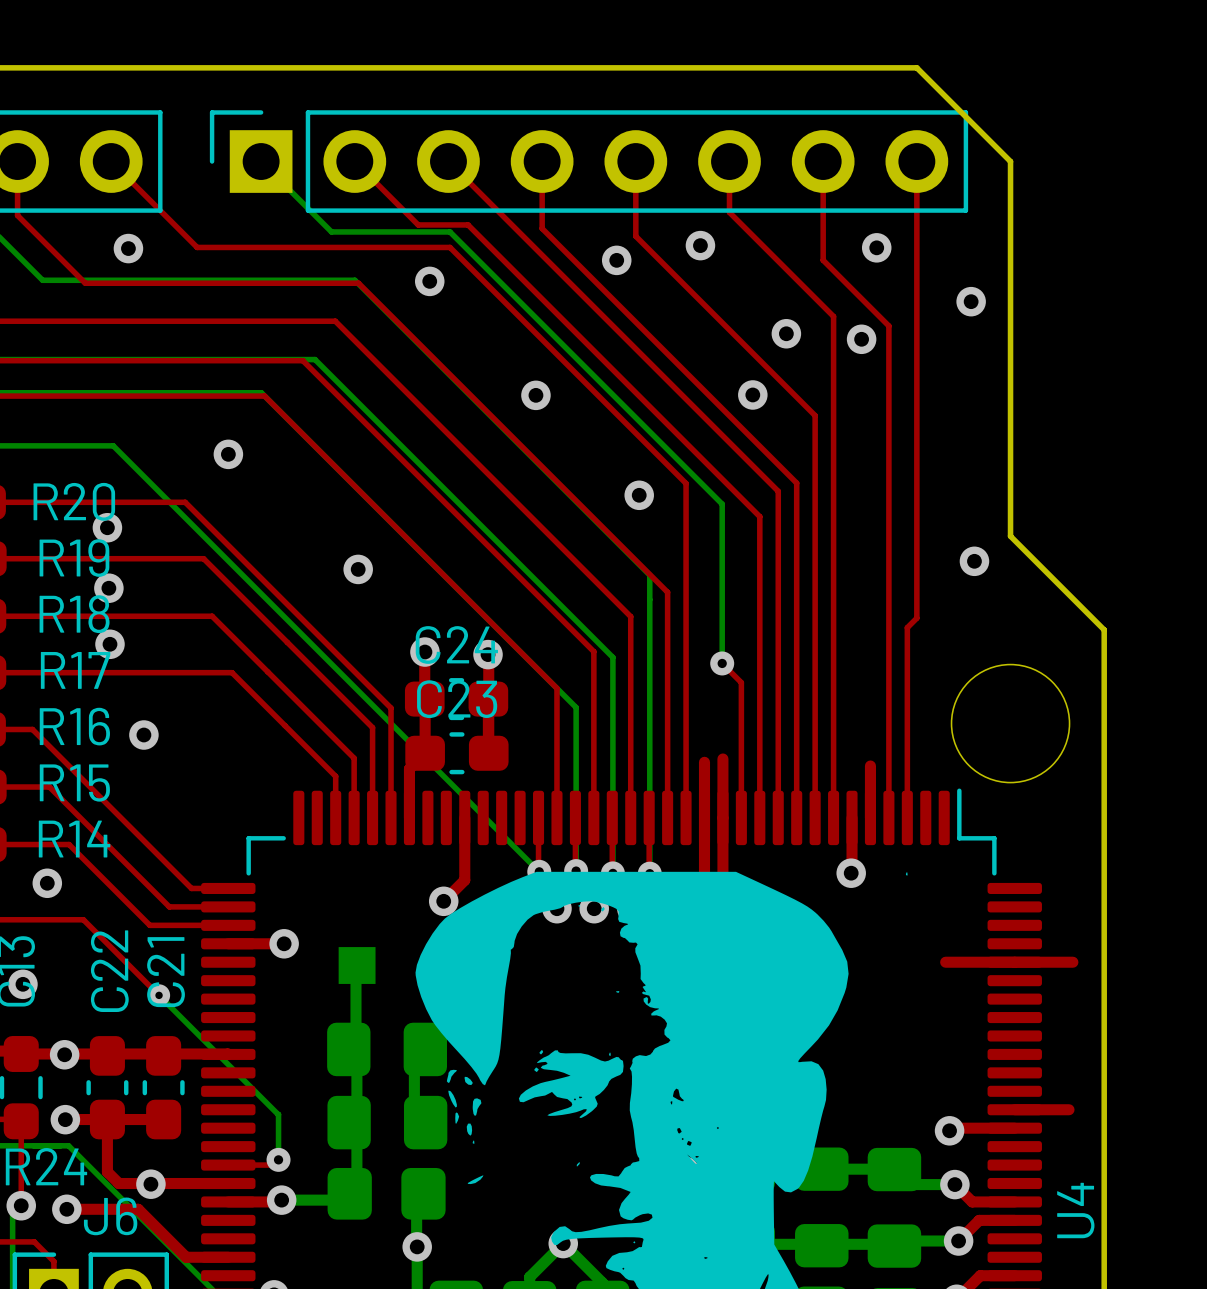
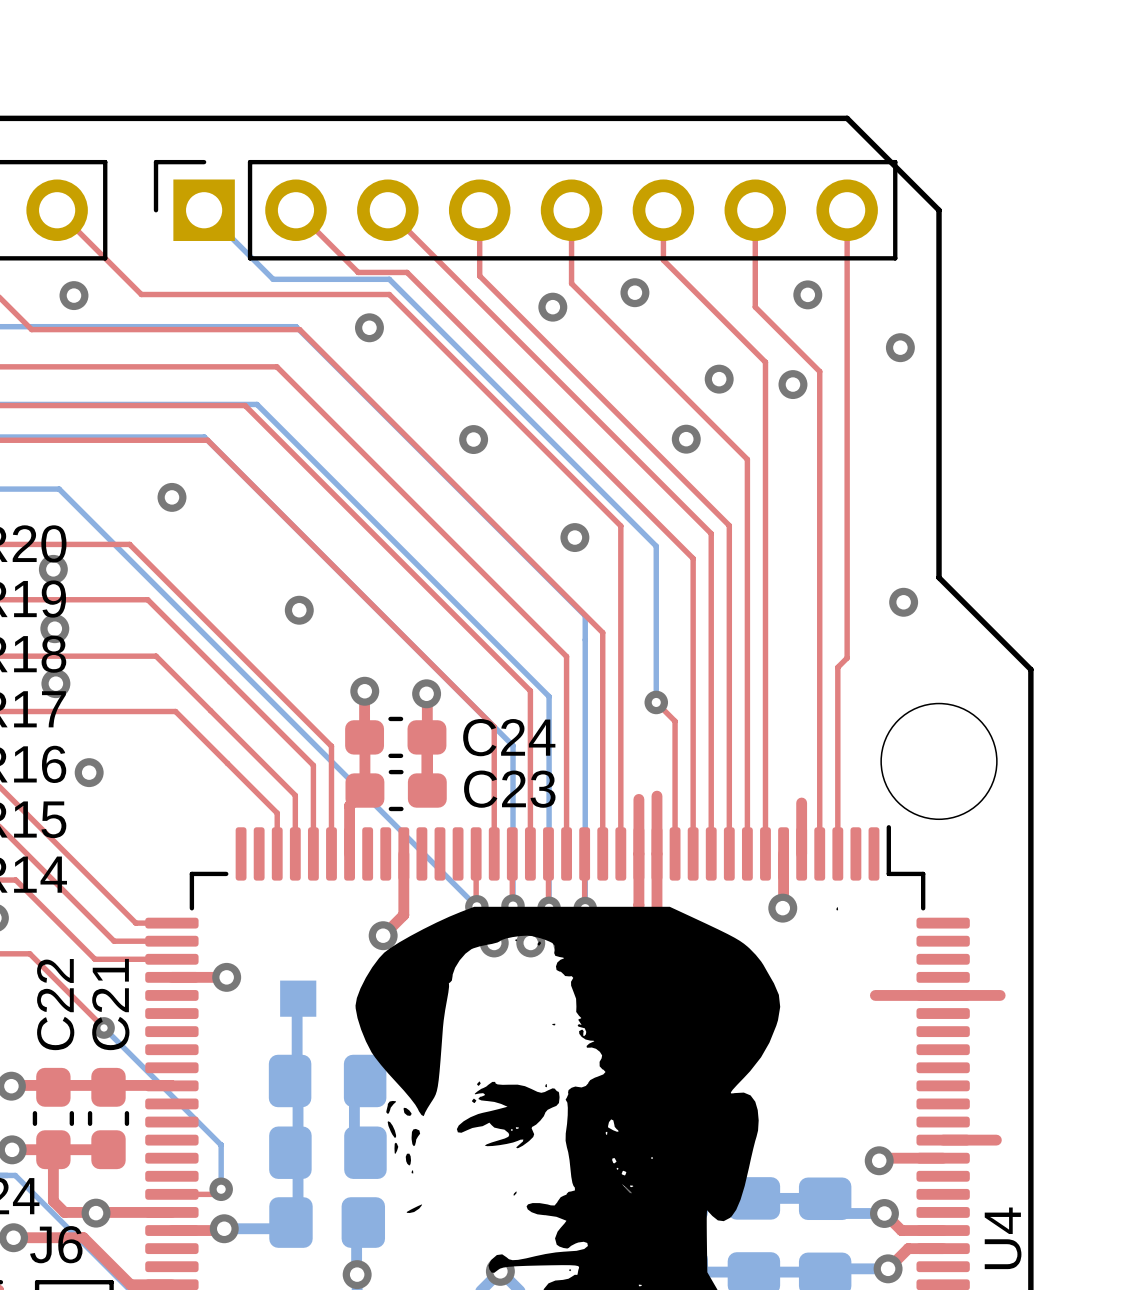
C24 name position: C24 (456, 645) -> C24 (509, 737)
C23 name position: C23 (457, 699) -> C23 (509, 789)

